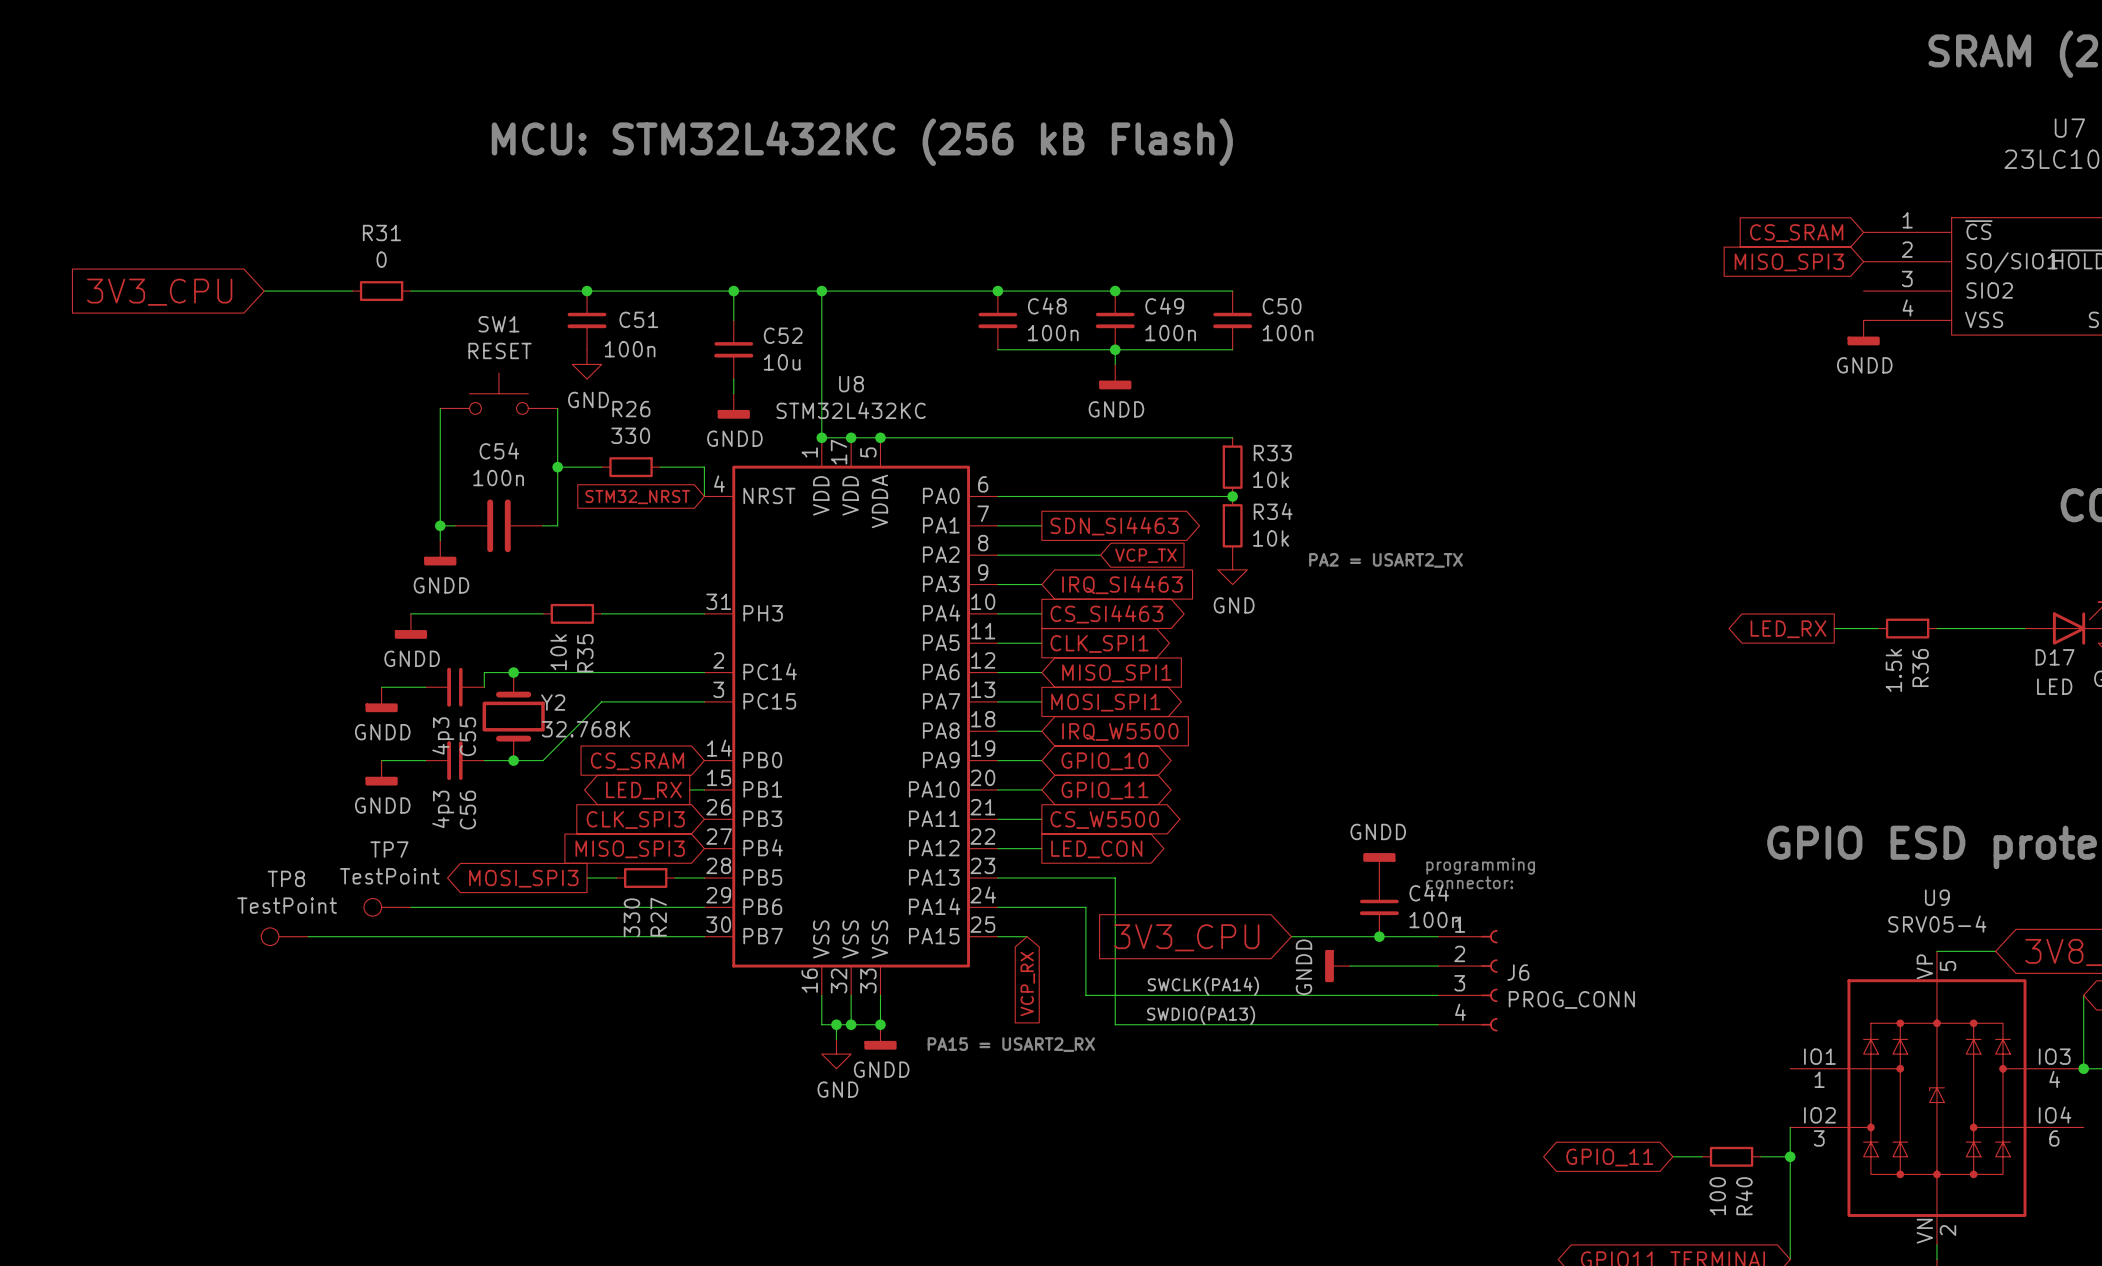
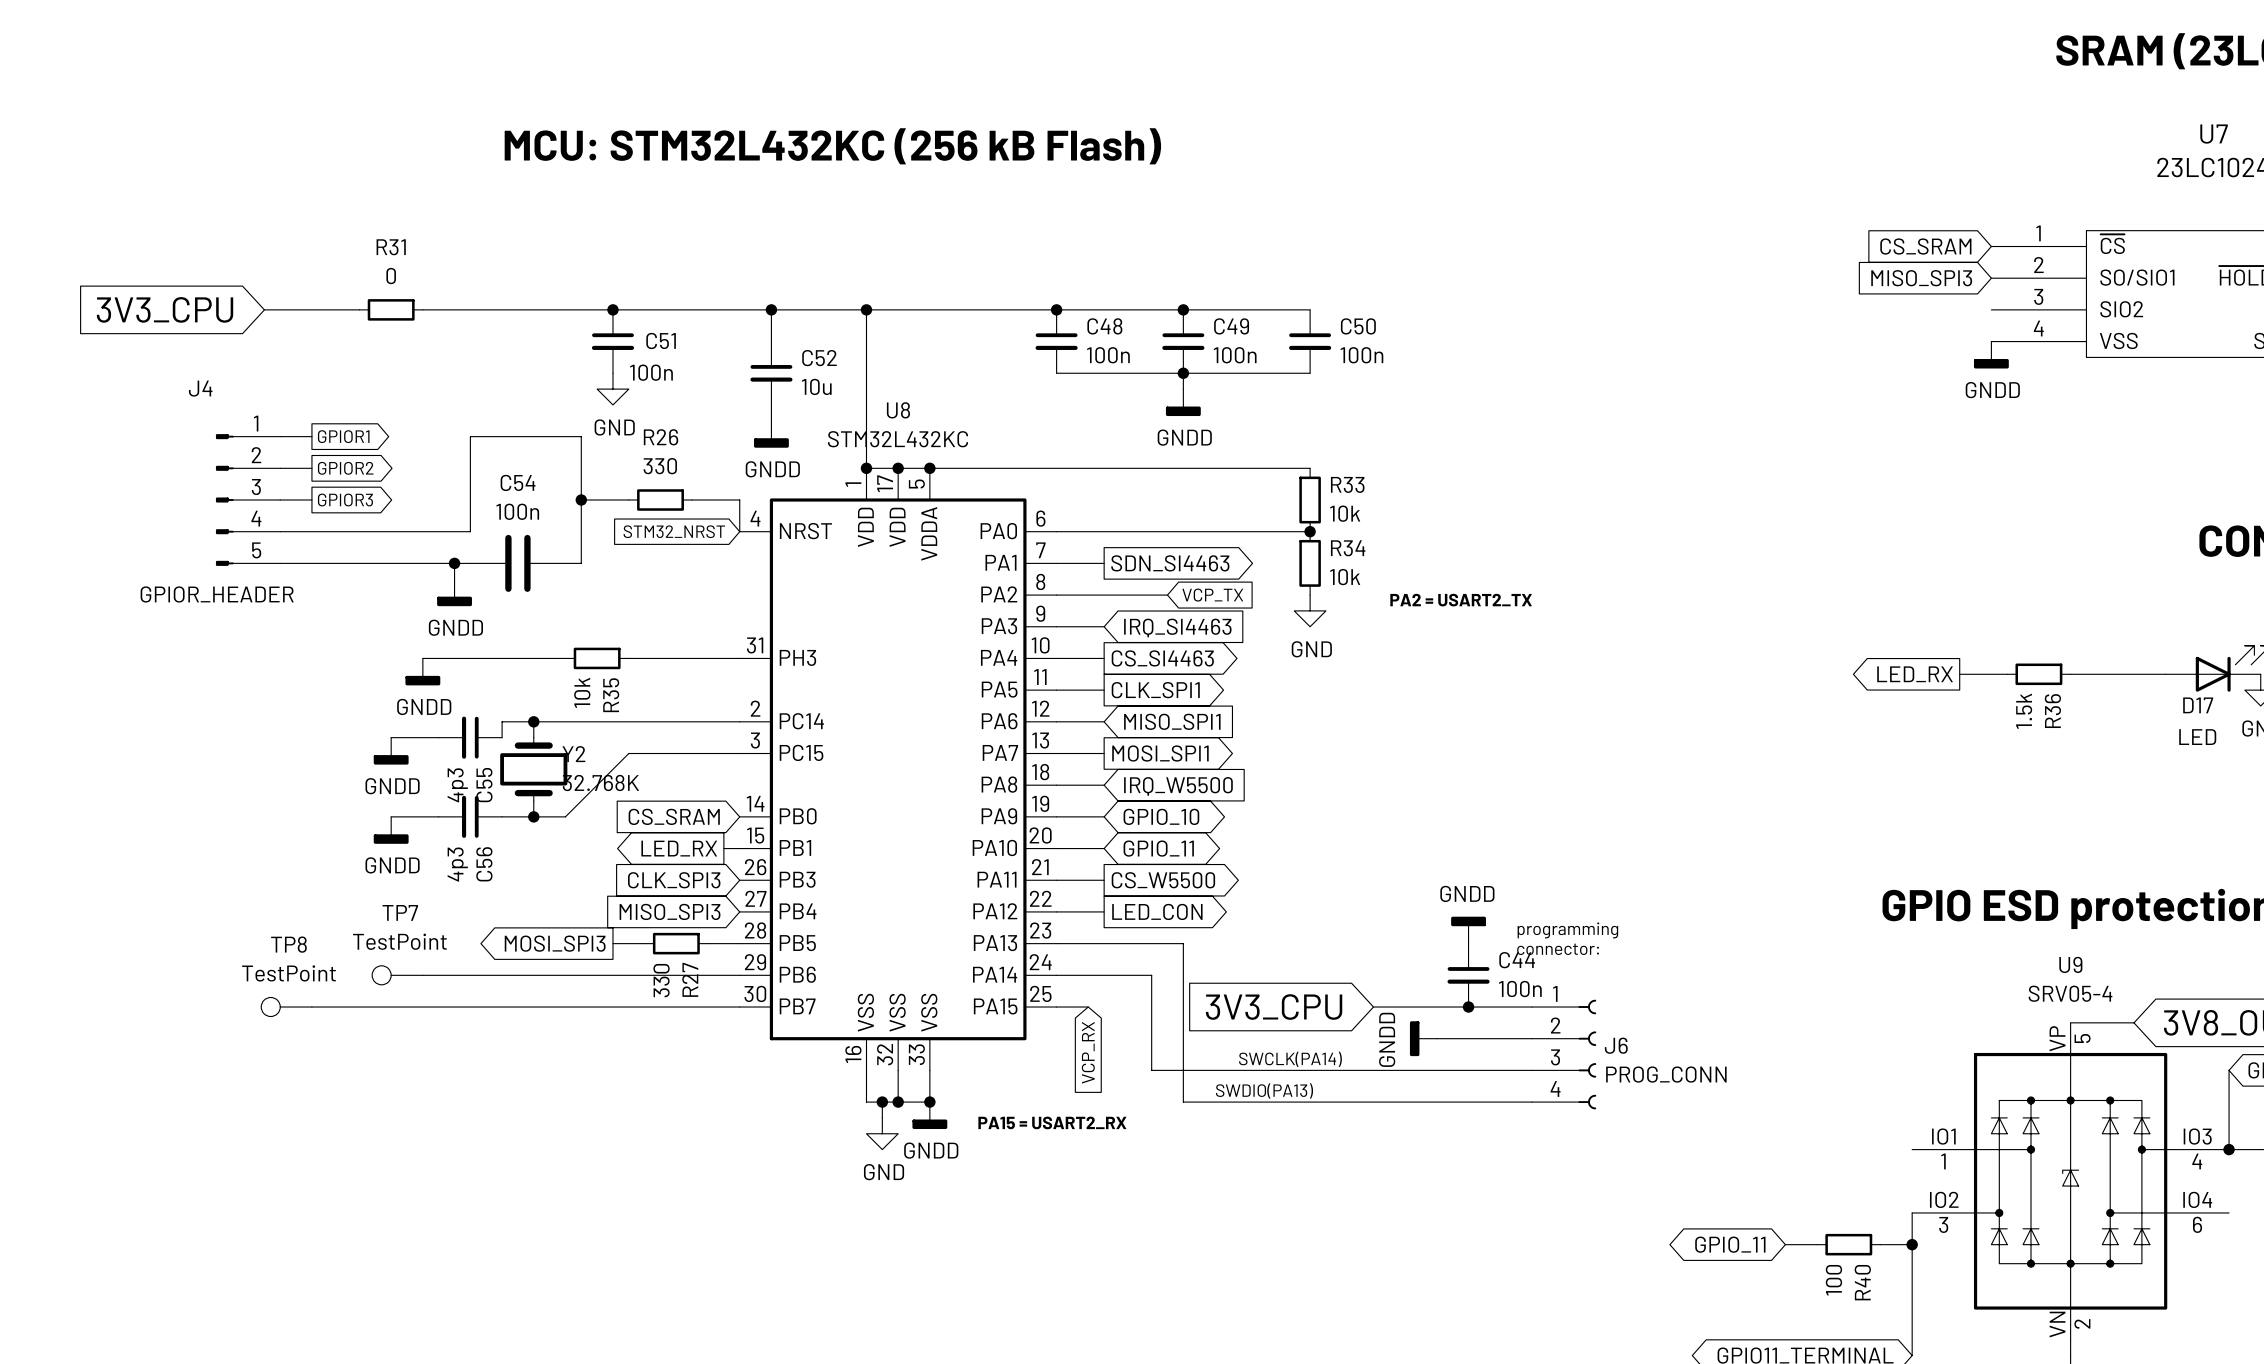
SW1: RESET (498, 393) -> none
wire: none -> (280, 436) (311, 436)
global label: none -> GPIOR1 (343, 436)
wire: (440, 408) (440, 525) -> (280, 563) (454, 563)
wire: none -> (581, 436) (470, 436) (470, 531) (280, 531)
wire: none -> (280, 468) (311, 468)
global label: none -> GPIOR2 (345, 468)
J4: none -> GPIOR_HEADER (248, 500)
wire: none -> (280, 500) (311, 500)
global label: none -> GPIOR3 (345, 500)

